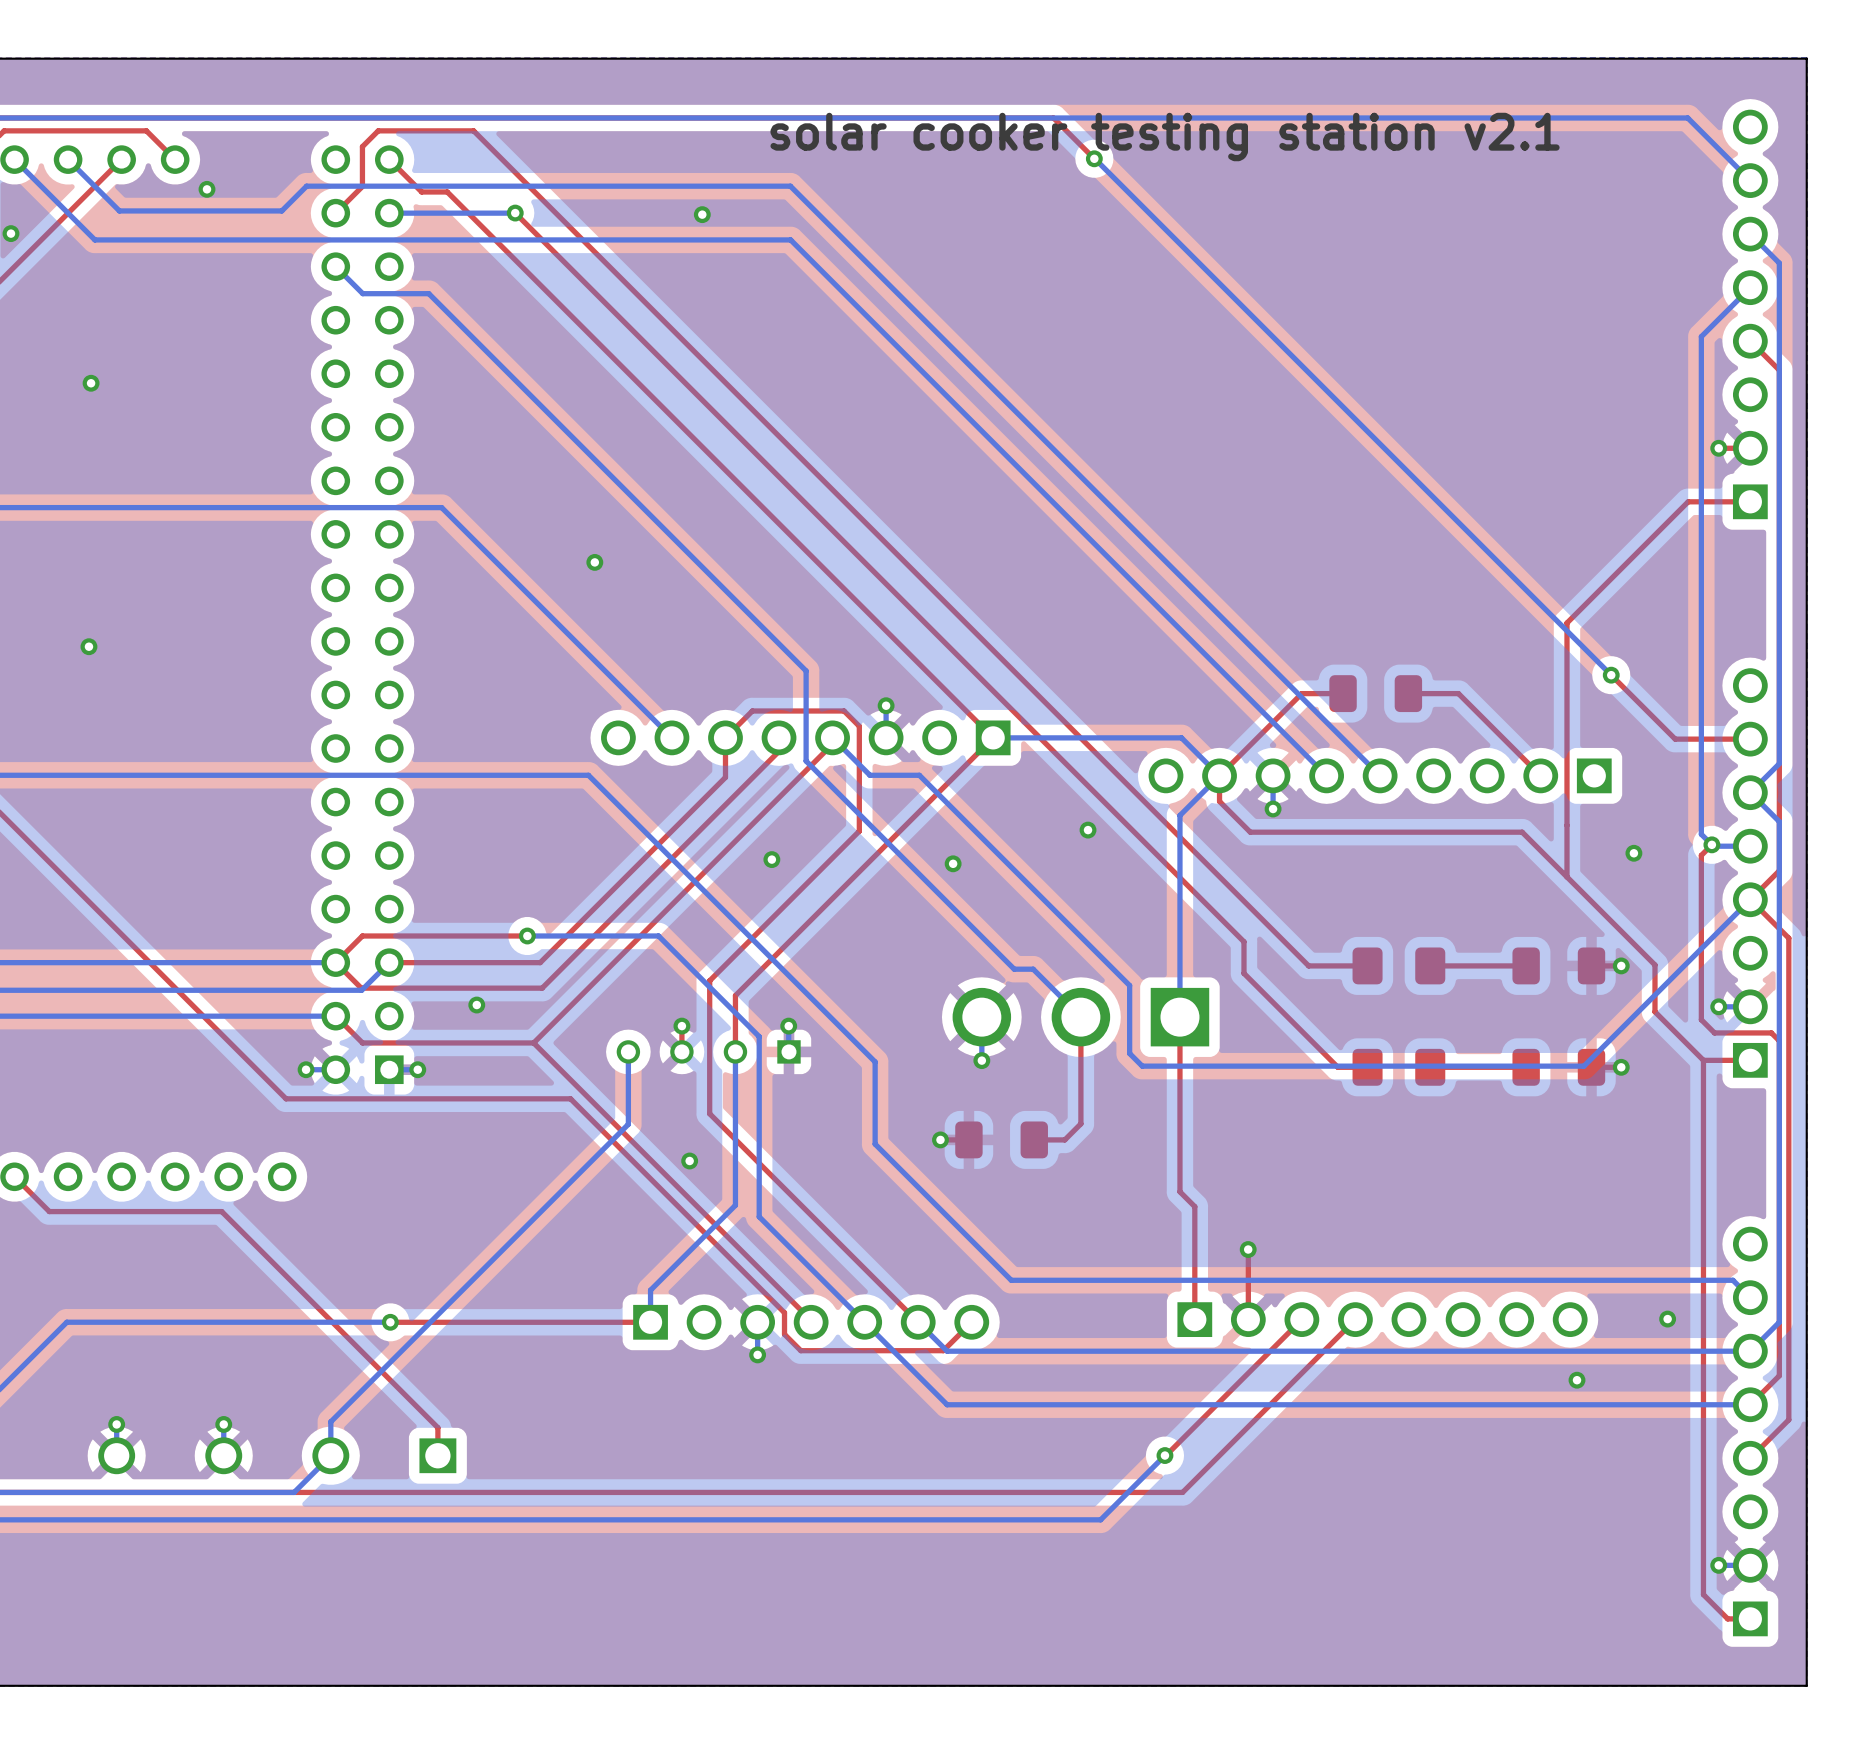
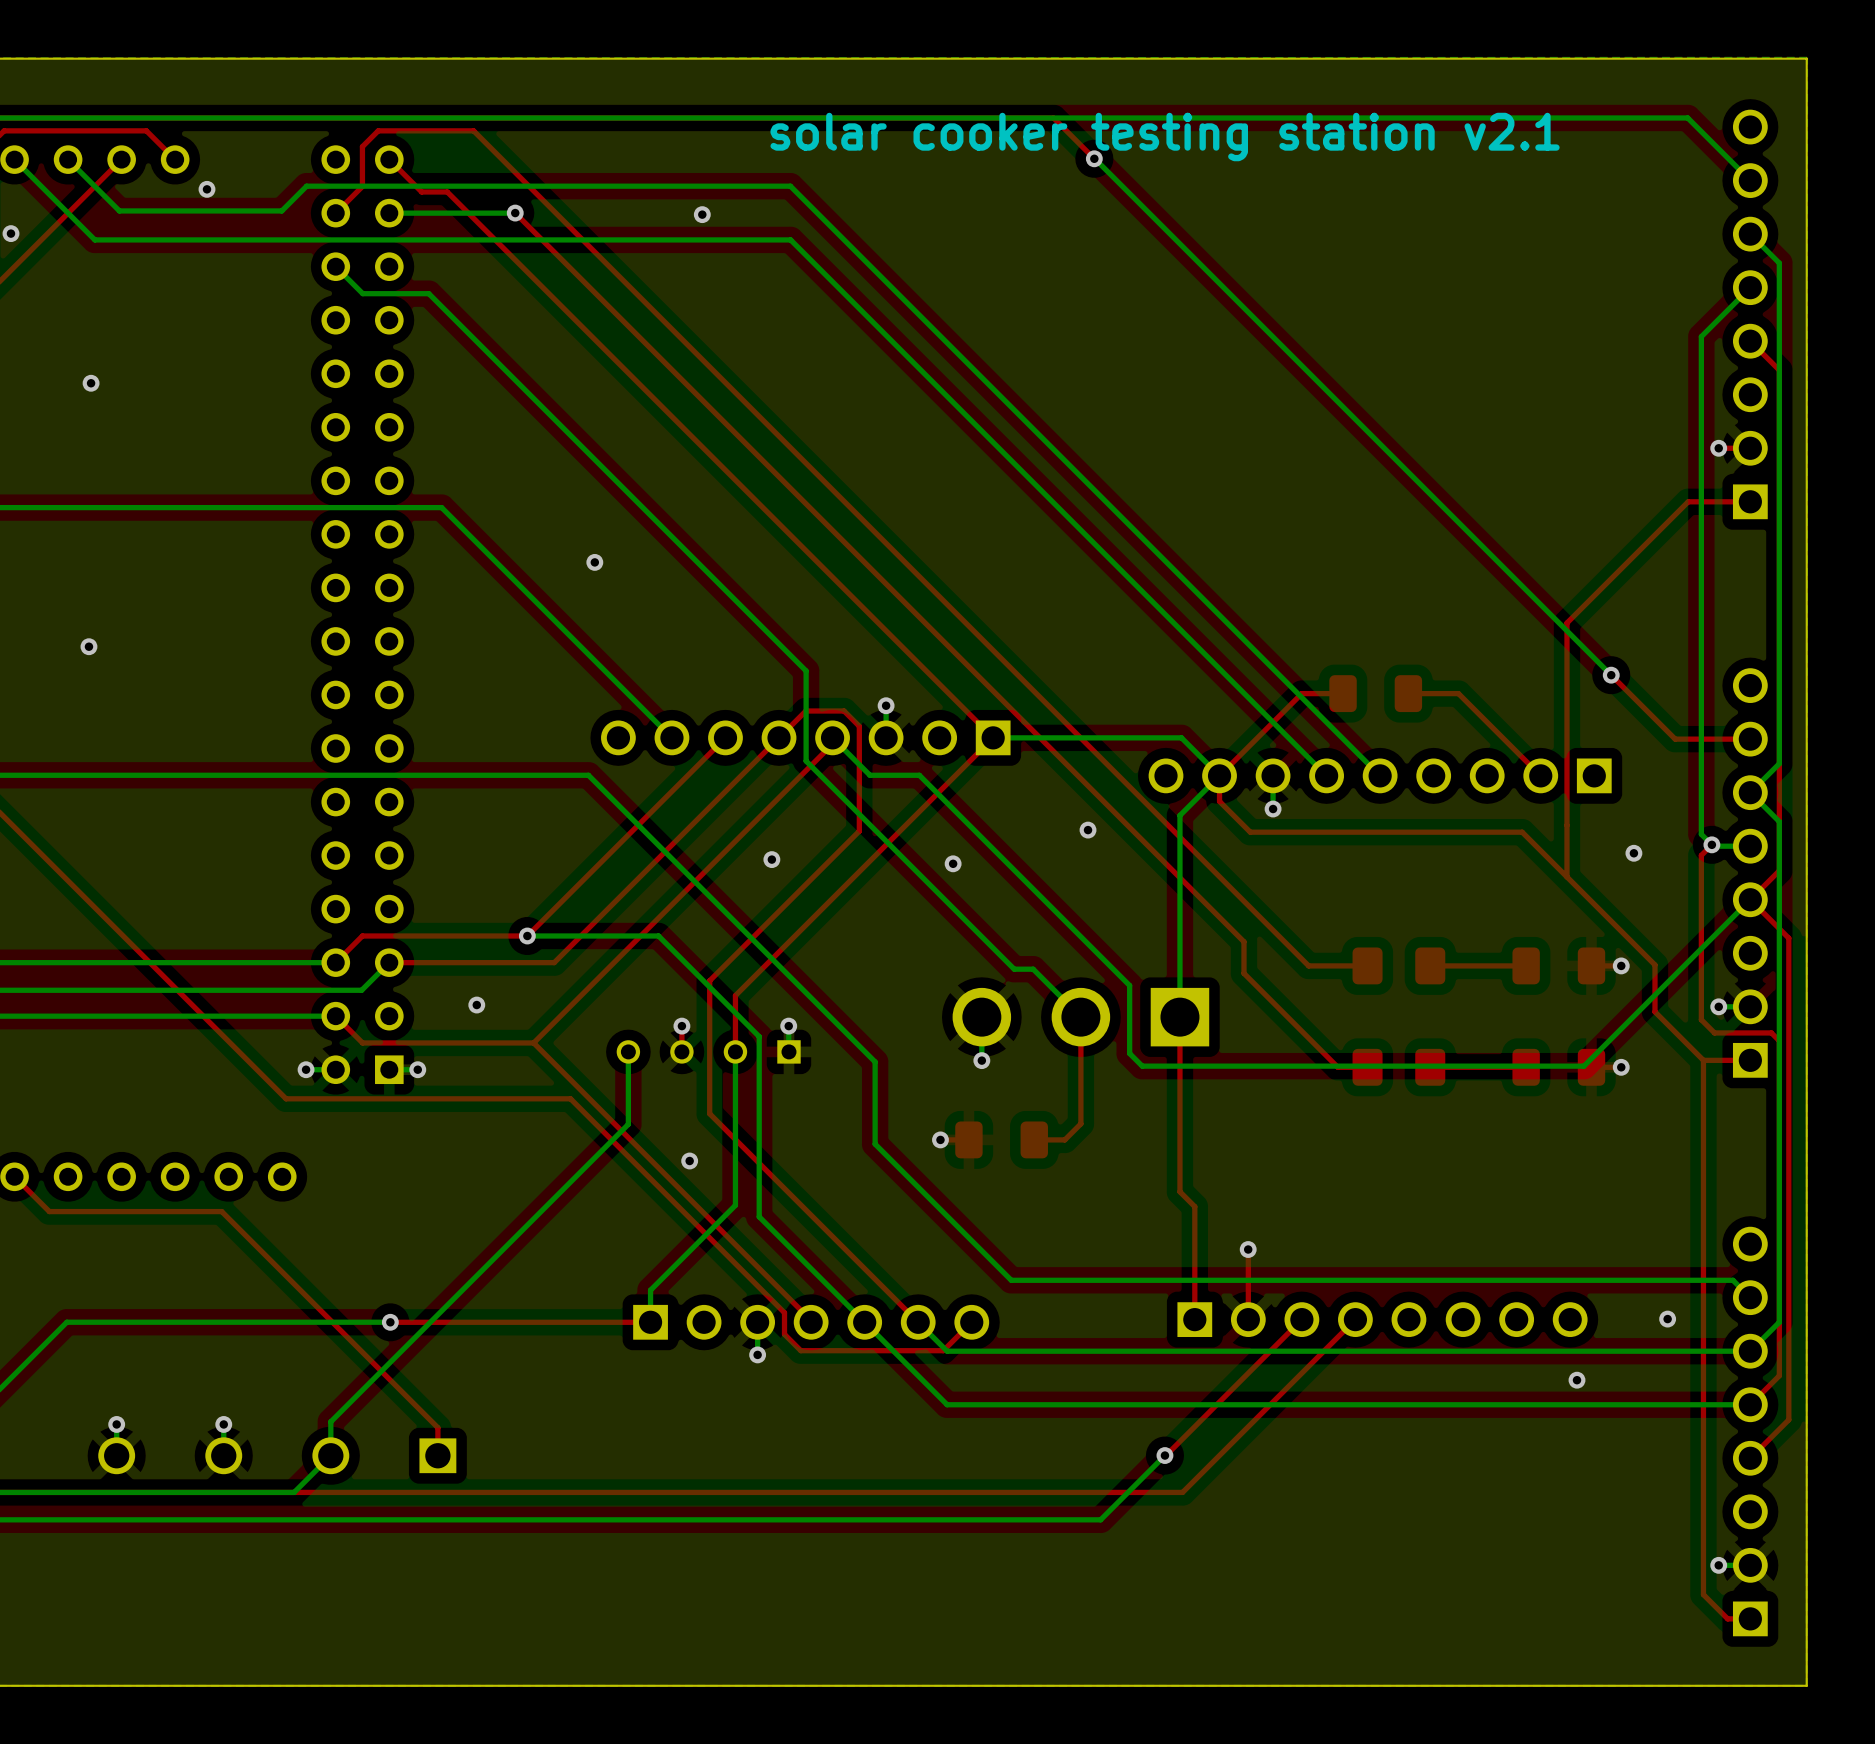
top track: (805, 711) (752, 711) (725, 737) (725, 777) (540, 962) -> (805, 711) (554, 962) (540, 962)
top track: none -> (725, 737) (527, 936)
top track: (779, 737) (779, 751) (542, 988) (361, 988) (335, 962) -> none

